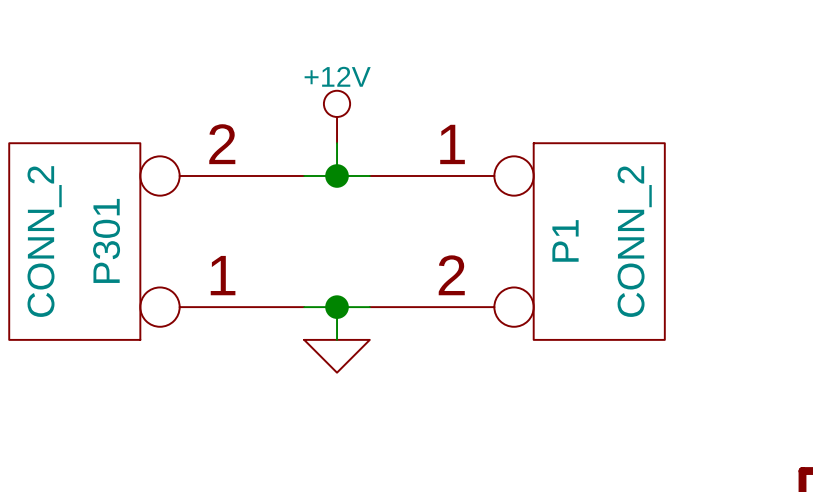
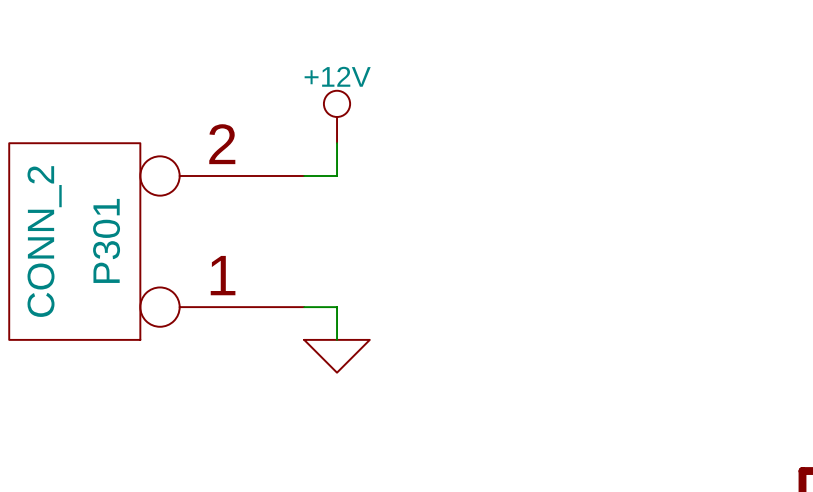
wire: (337, 176) (369, 176) -> none
junction: (337, 176) -> none
P1: CONN_2 (517, 241) -> none
wire: (337, 307) (369, 307) -> none
junction: (337, 307) -> none

